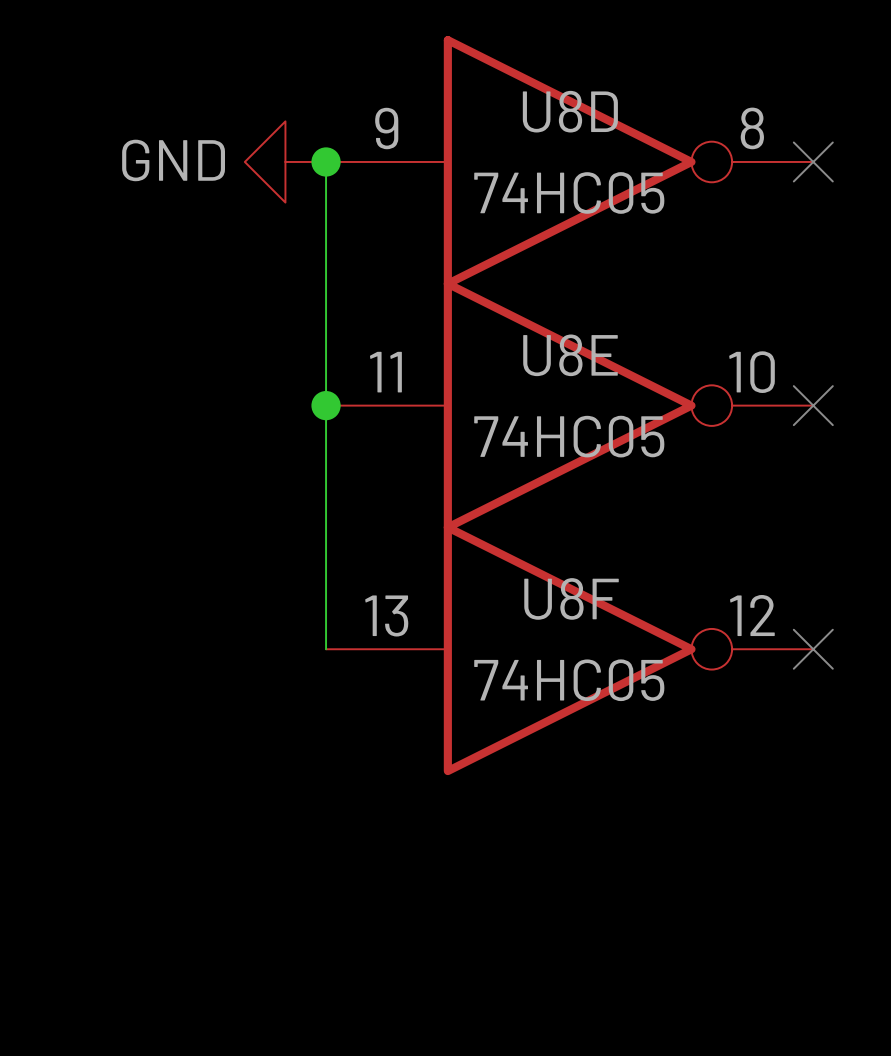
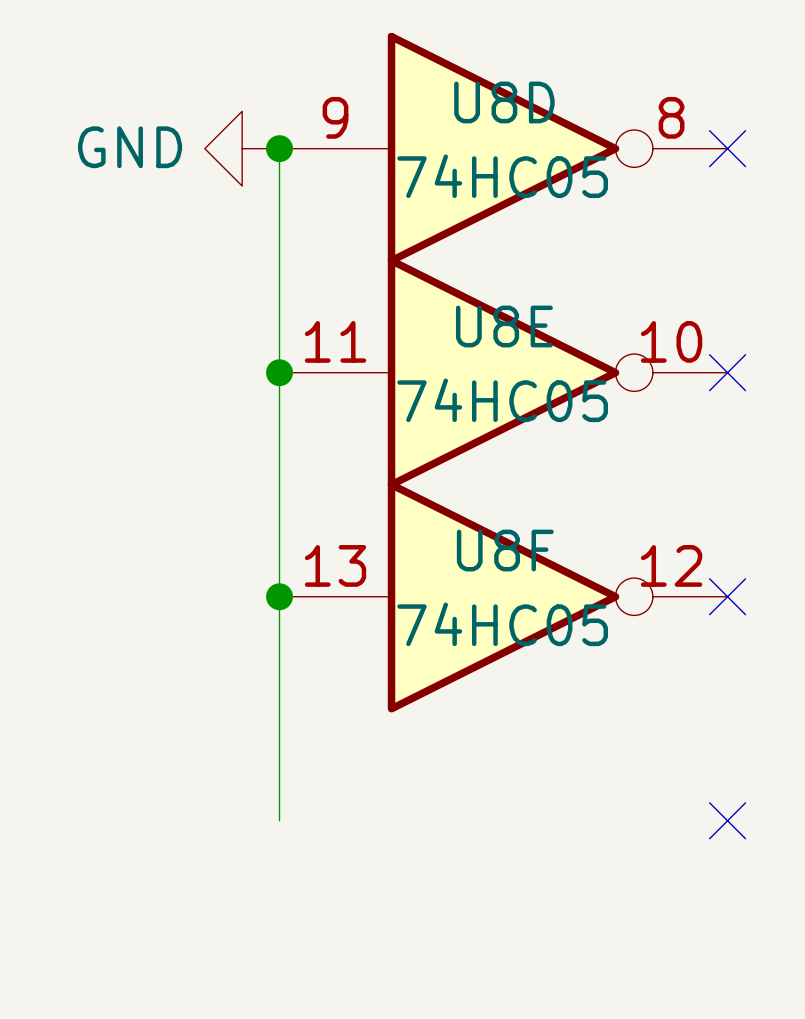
wire: none -> (279, 596) (279, 820)
junction: none -> (279, 596)
no-connect mark: none -> (727, 820)

